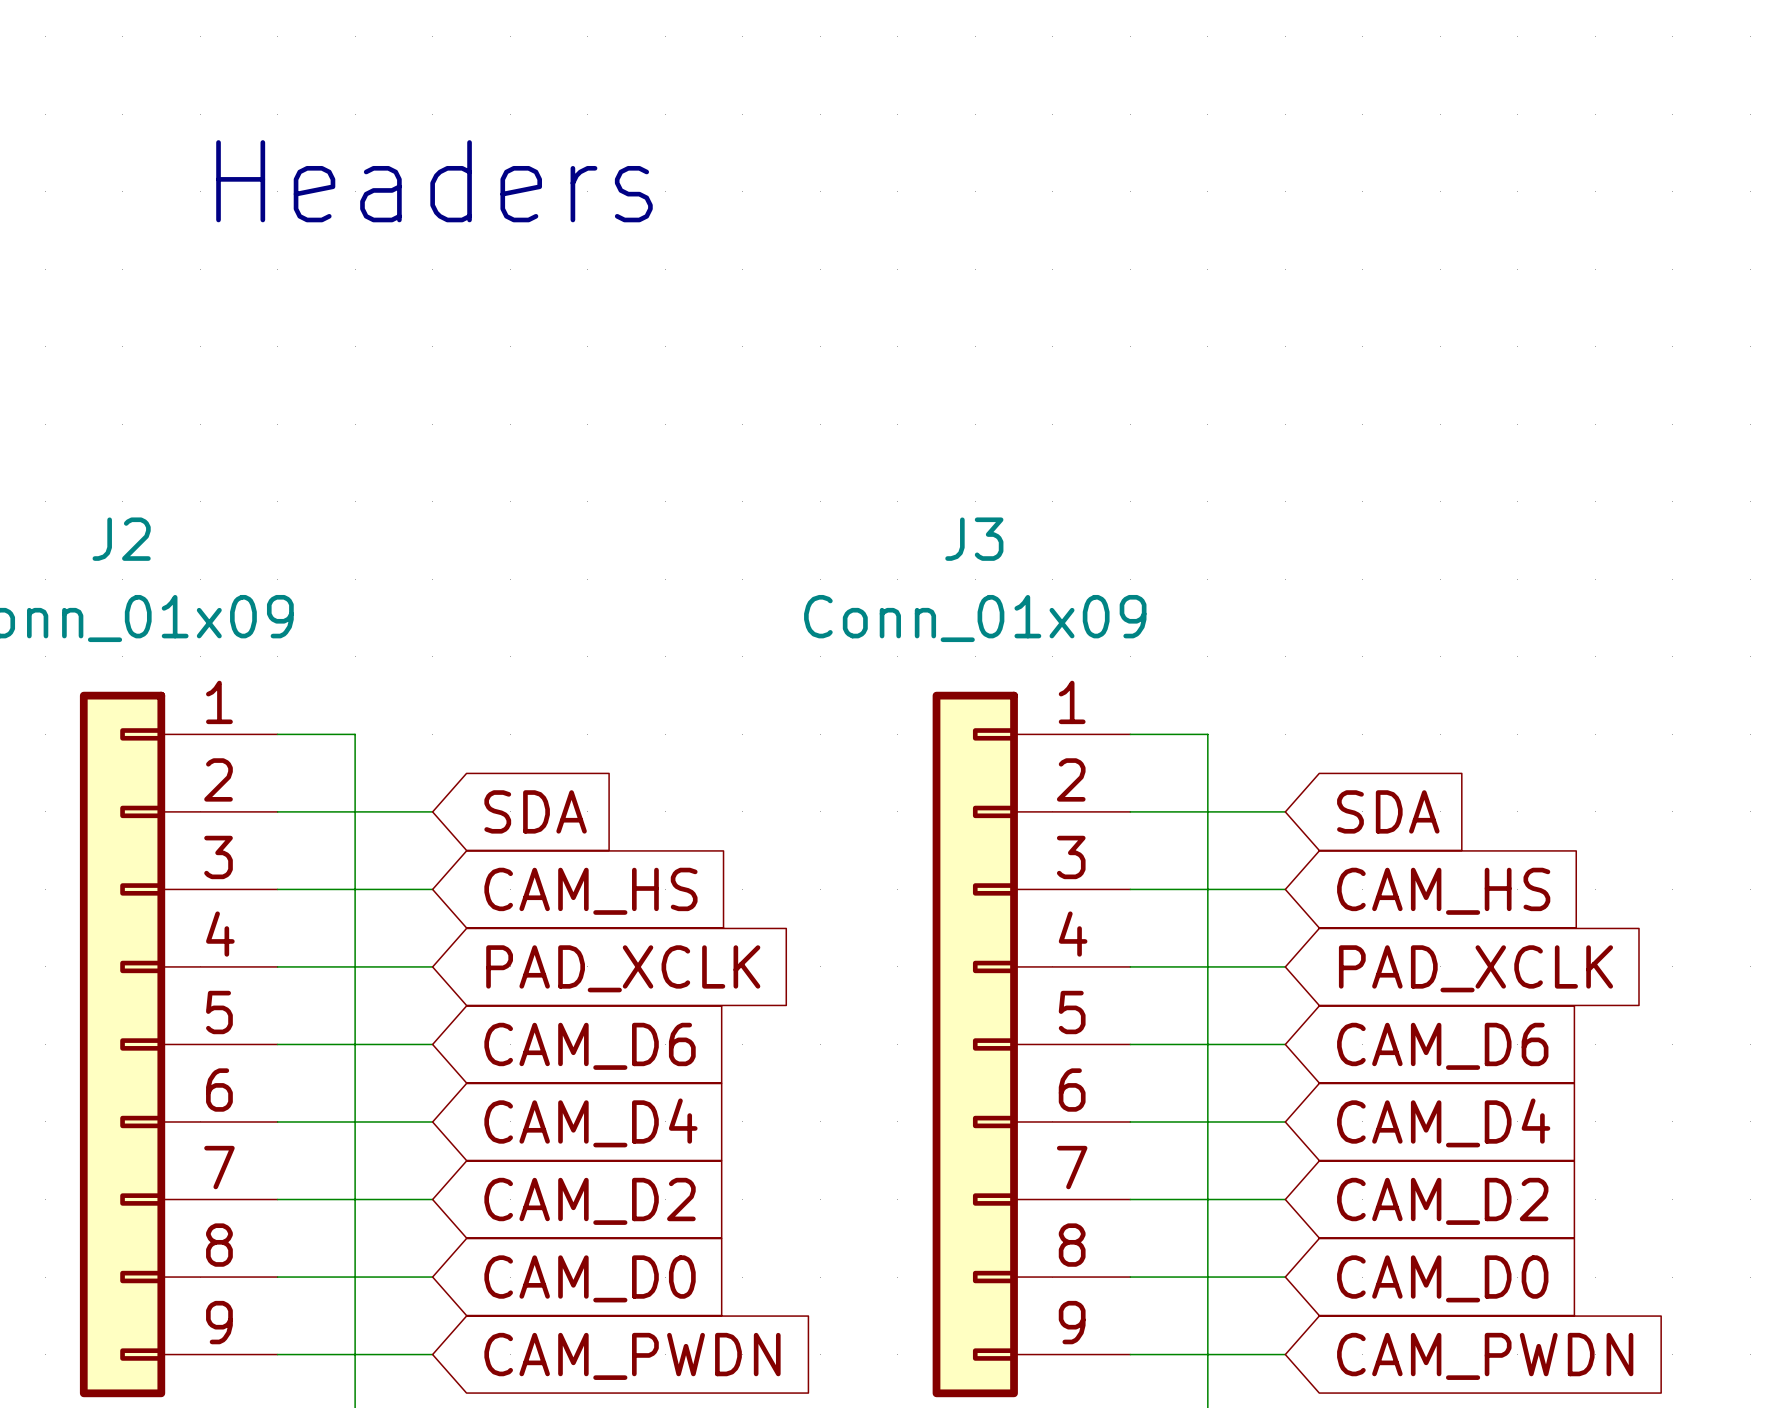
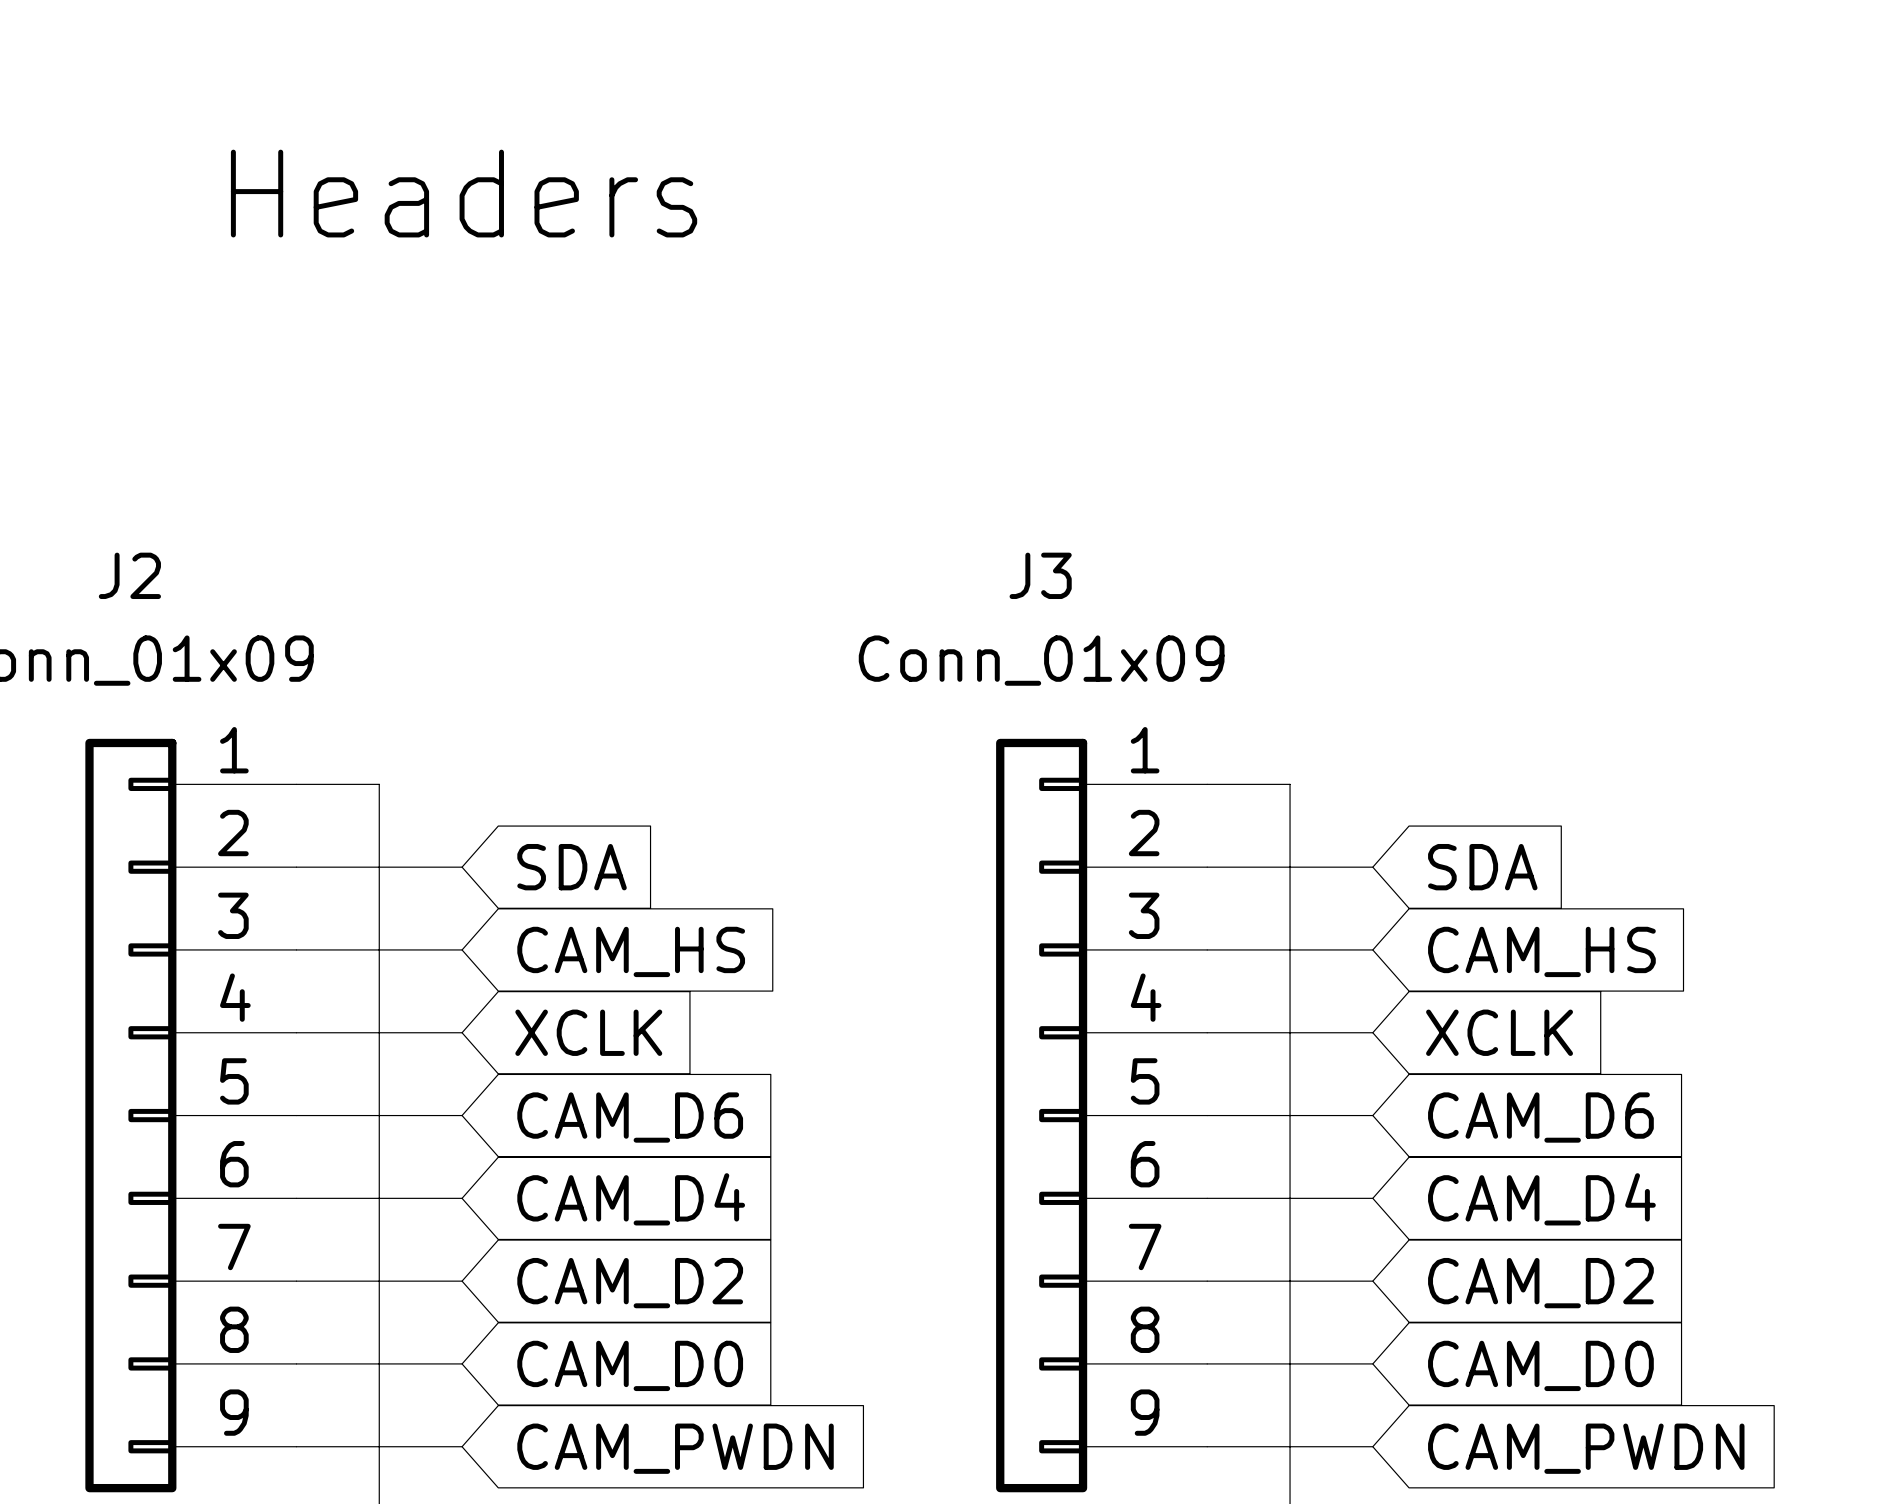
global label: PAD_XCLK (623, 968) -> XCLK (588, 1032)
global label: PAD_XCLK (1475, 968) -> XCLK (1499, 1032)

